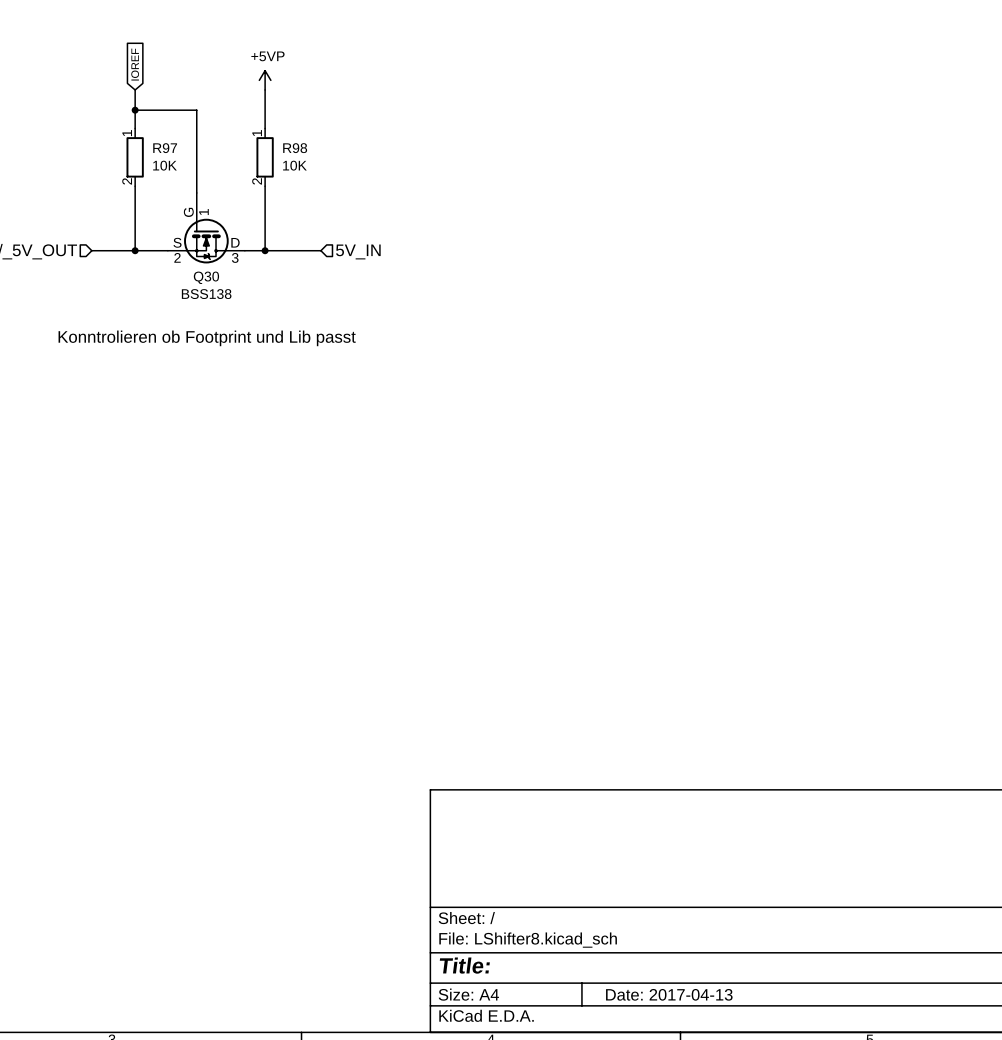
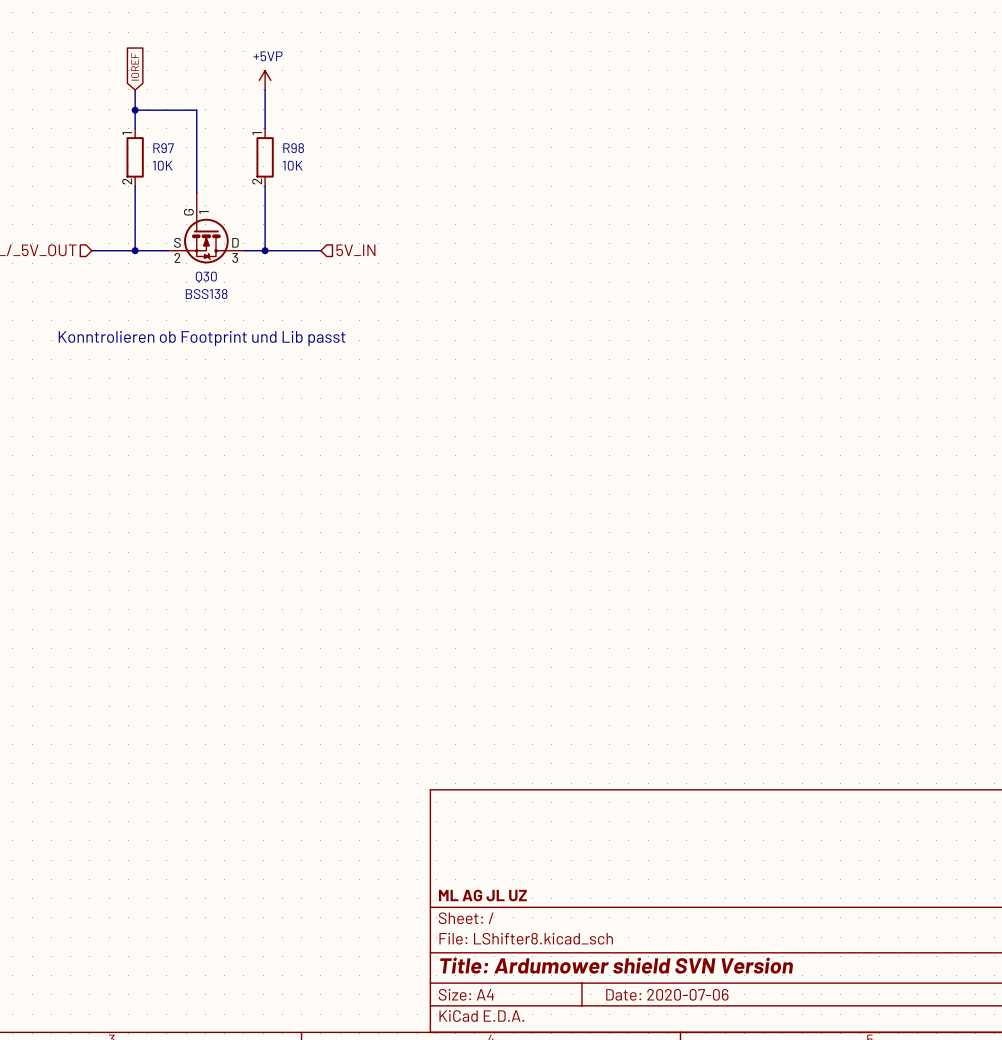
title block: none -> ML AG JL UZ (482, 895)
title block: Title: (464, 965) -> Title: Ardumower shield SVN Version (616, 965)
title block: Date: 2017-04-13 (669, 994) -> Date: 2020-07-06 (667, 994)

